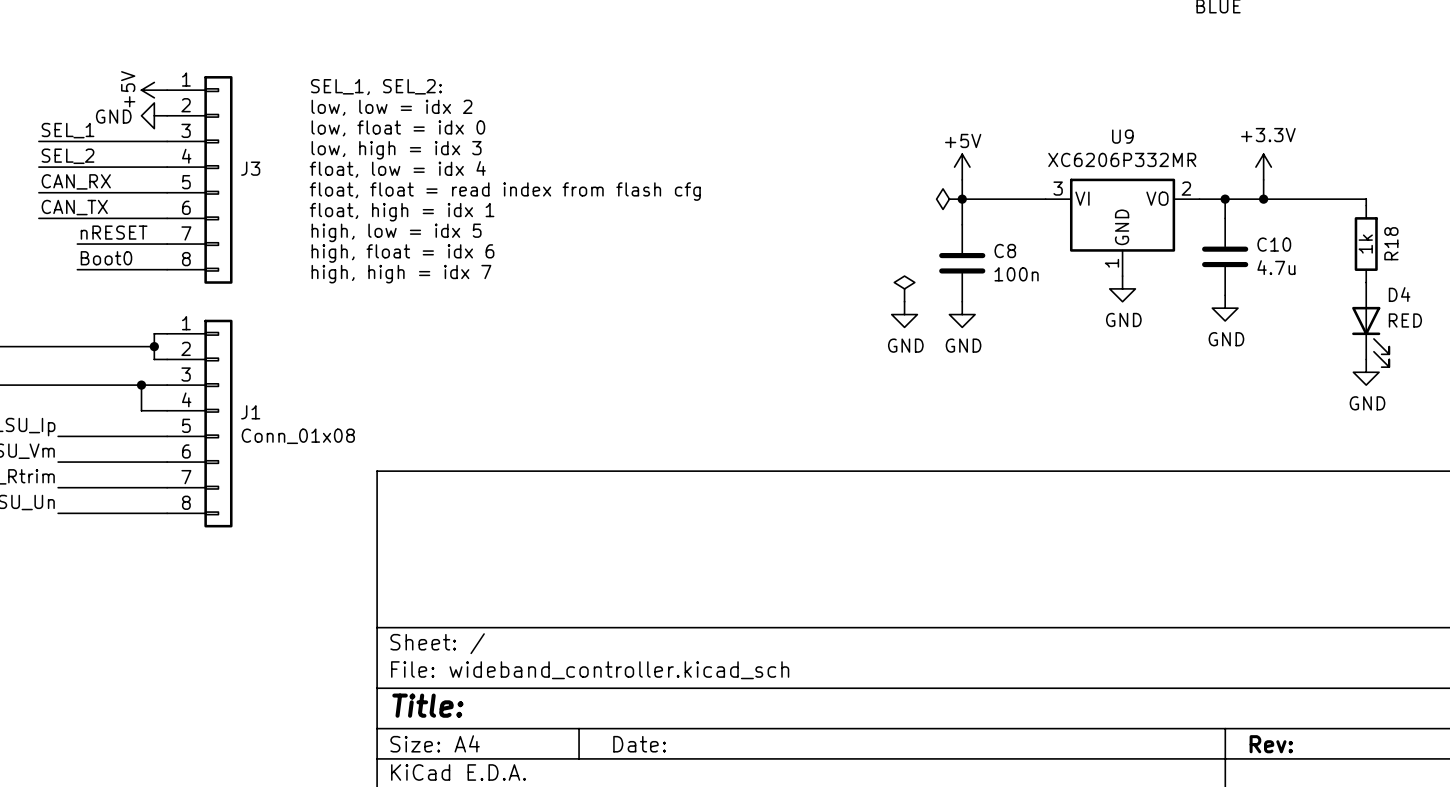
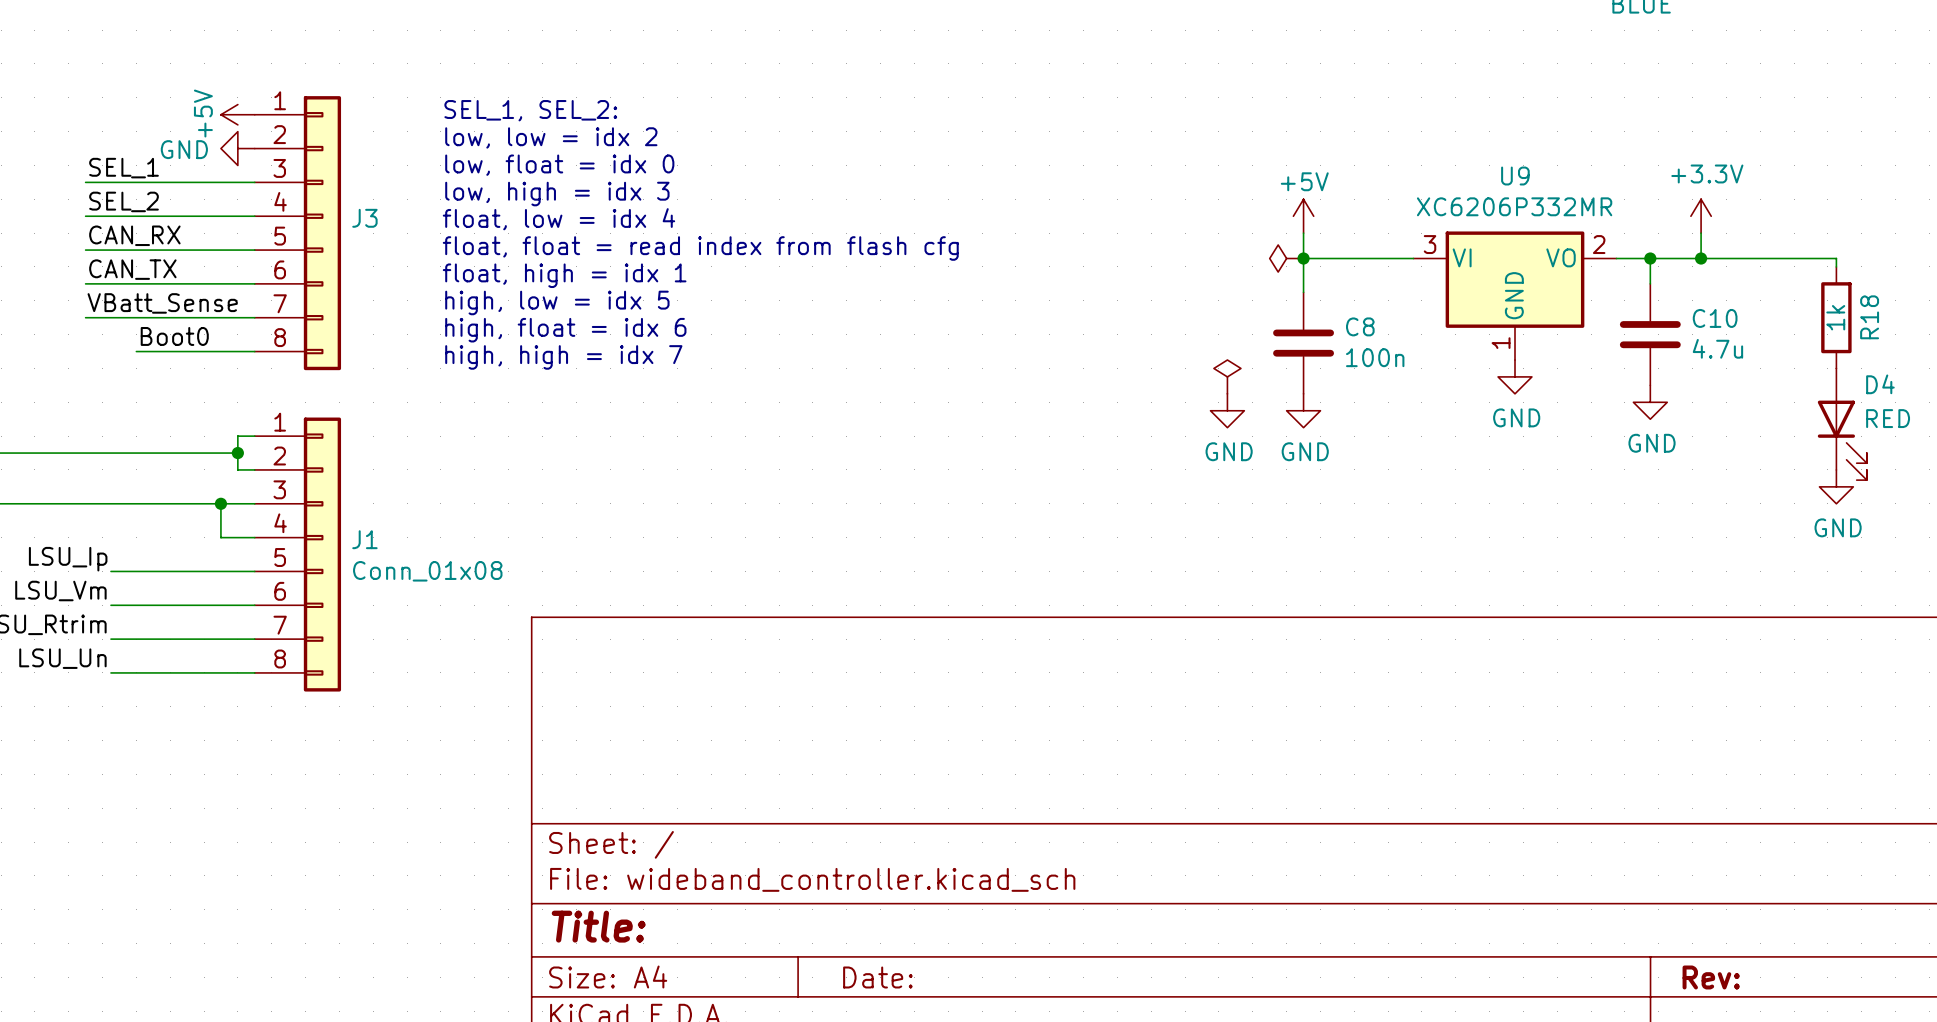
label: nRESET (114, 232) -> none
label: none -> VBatt_Sense (162, 303)
wire: none -> (85, 317) (136, 317)

